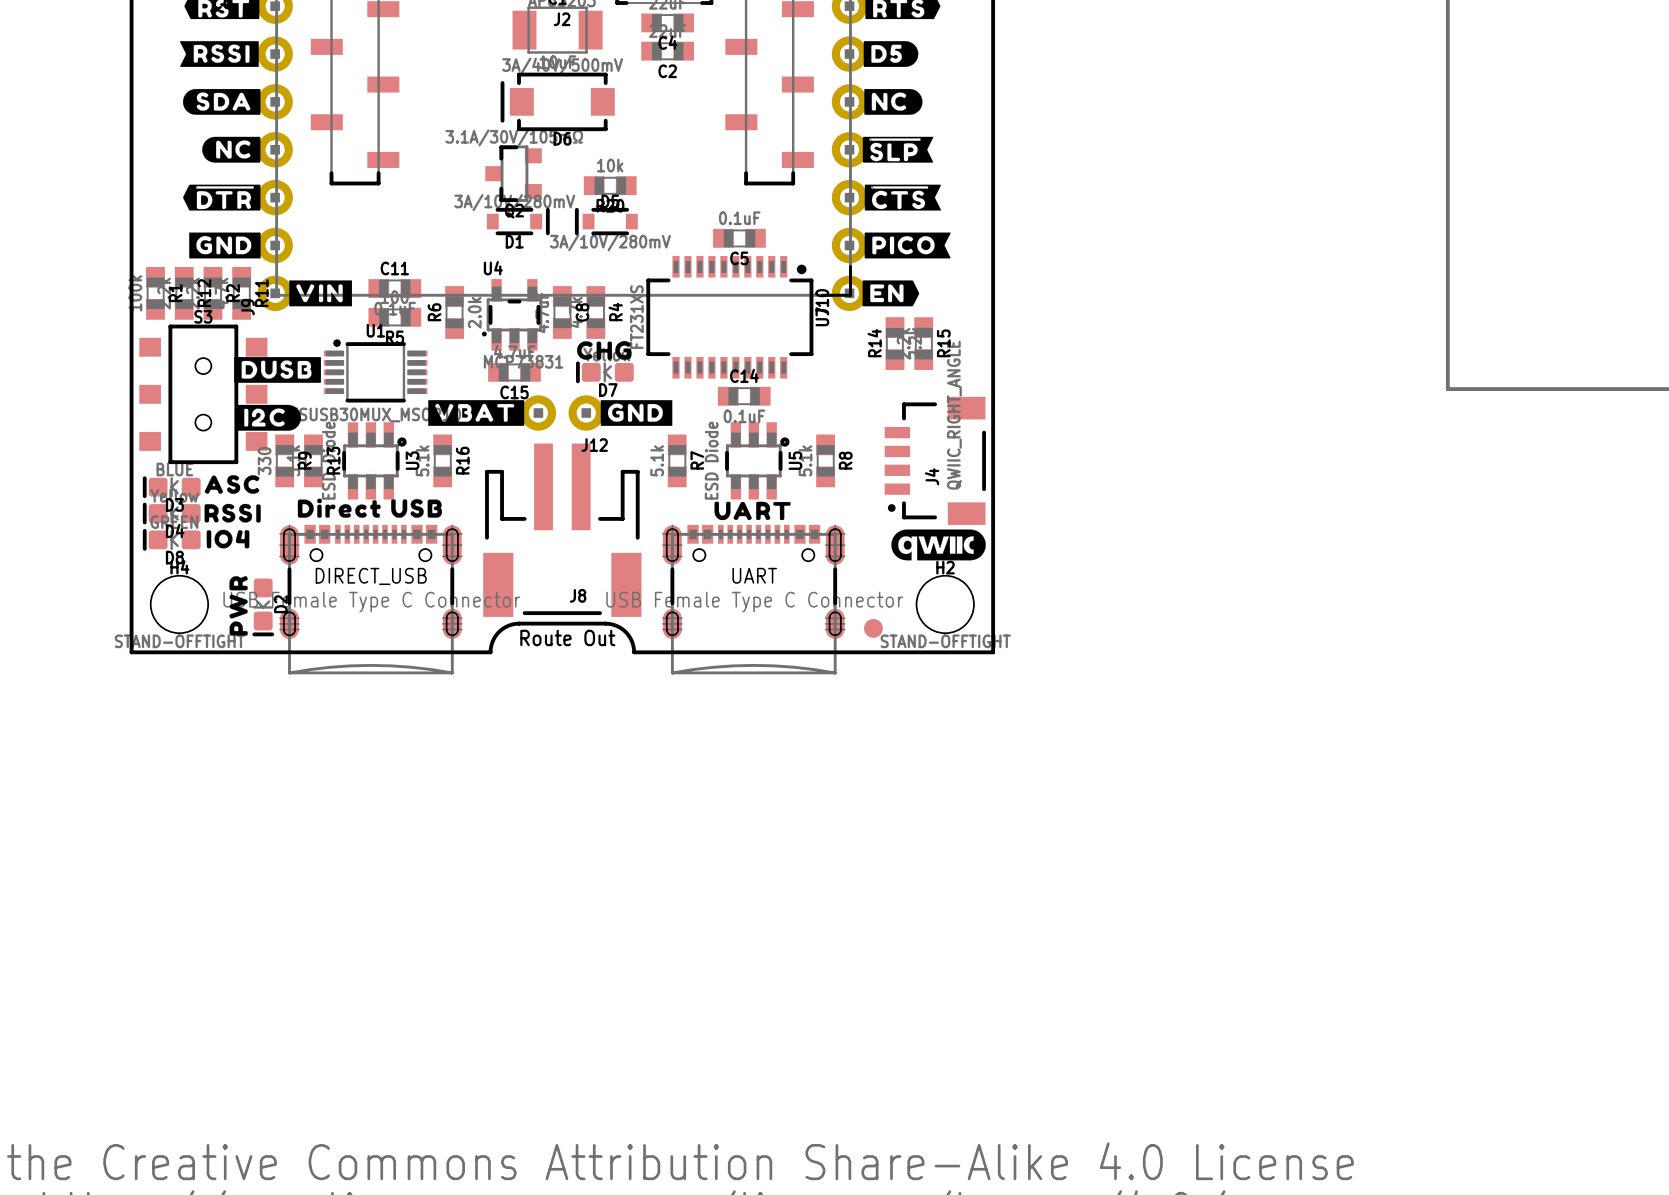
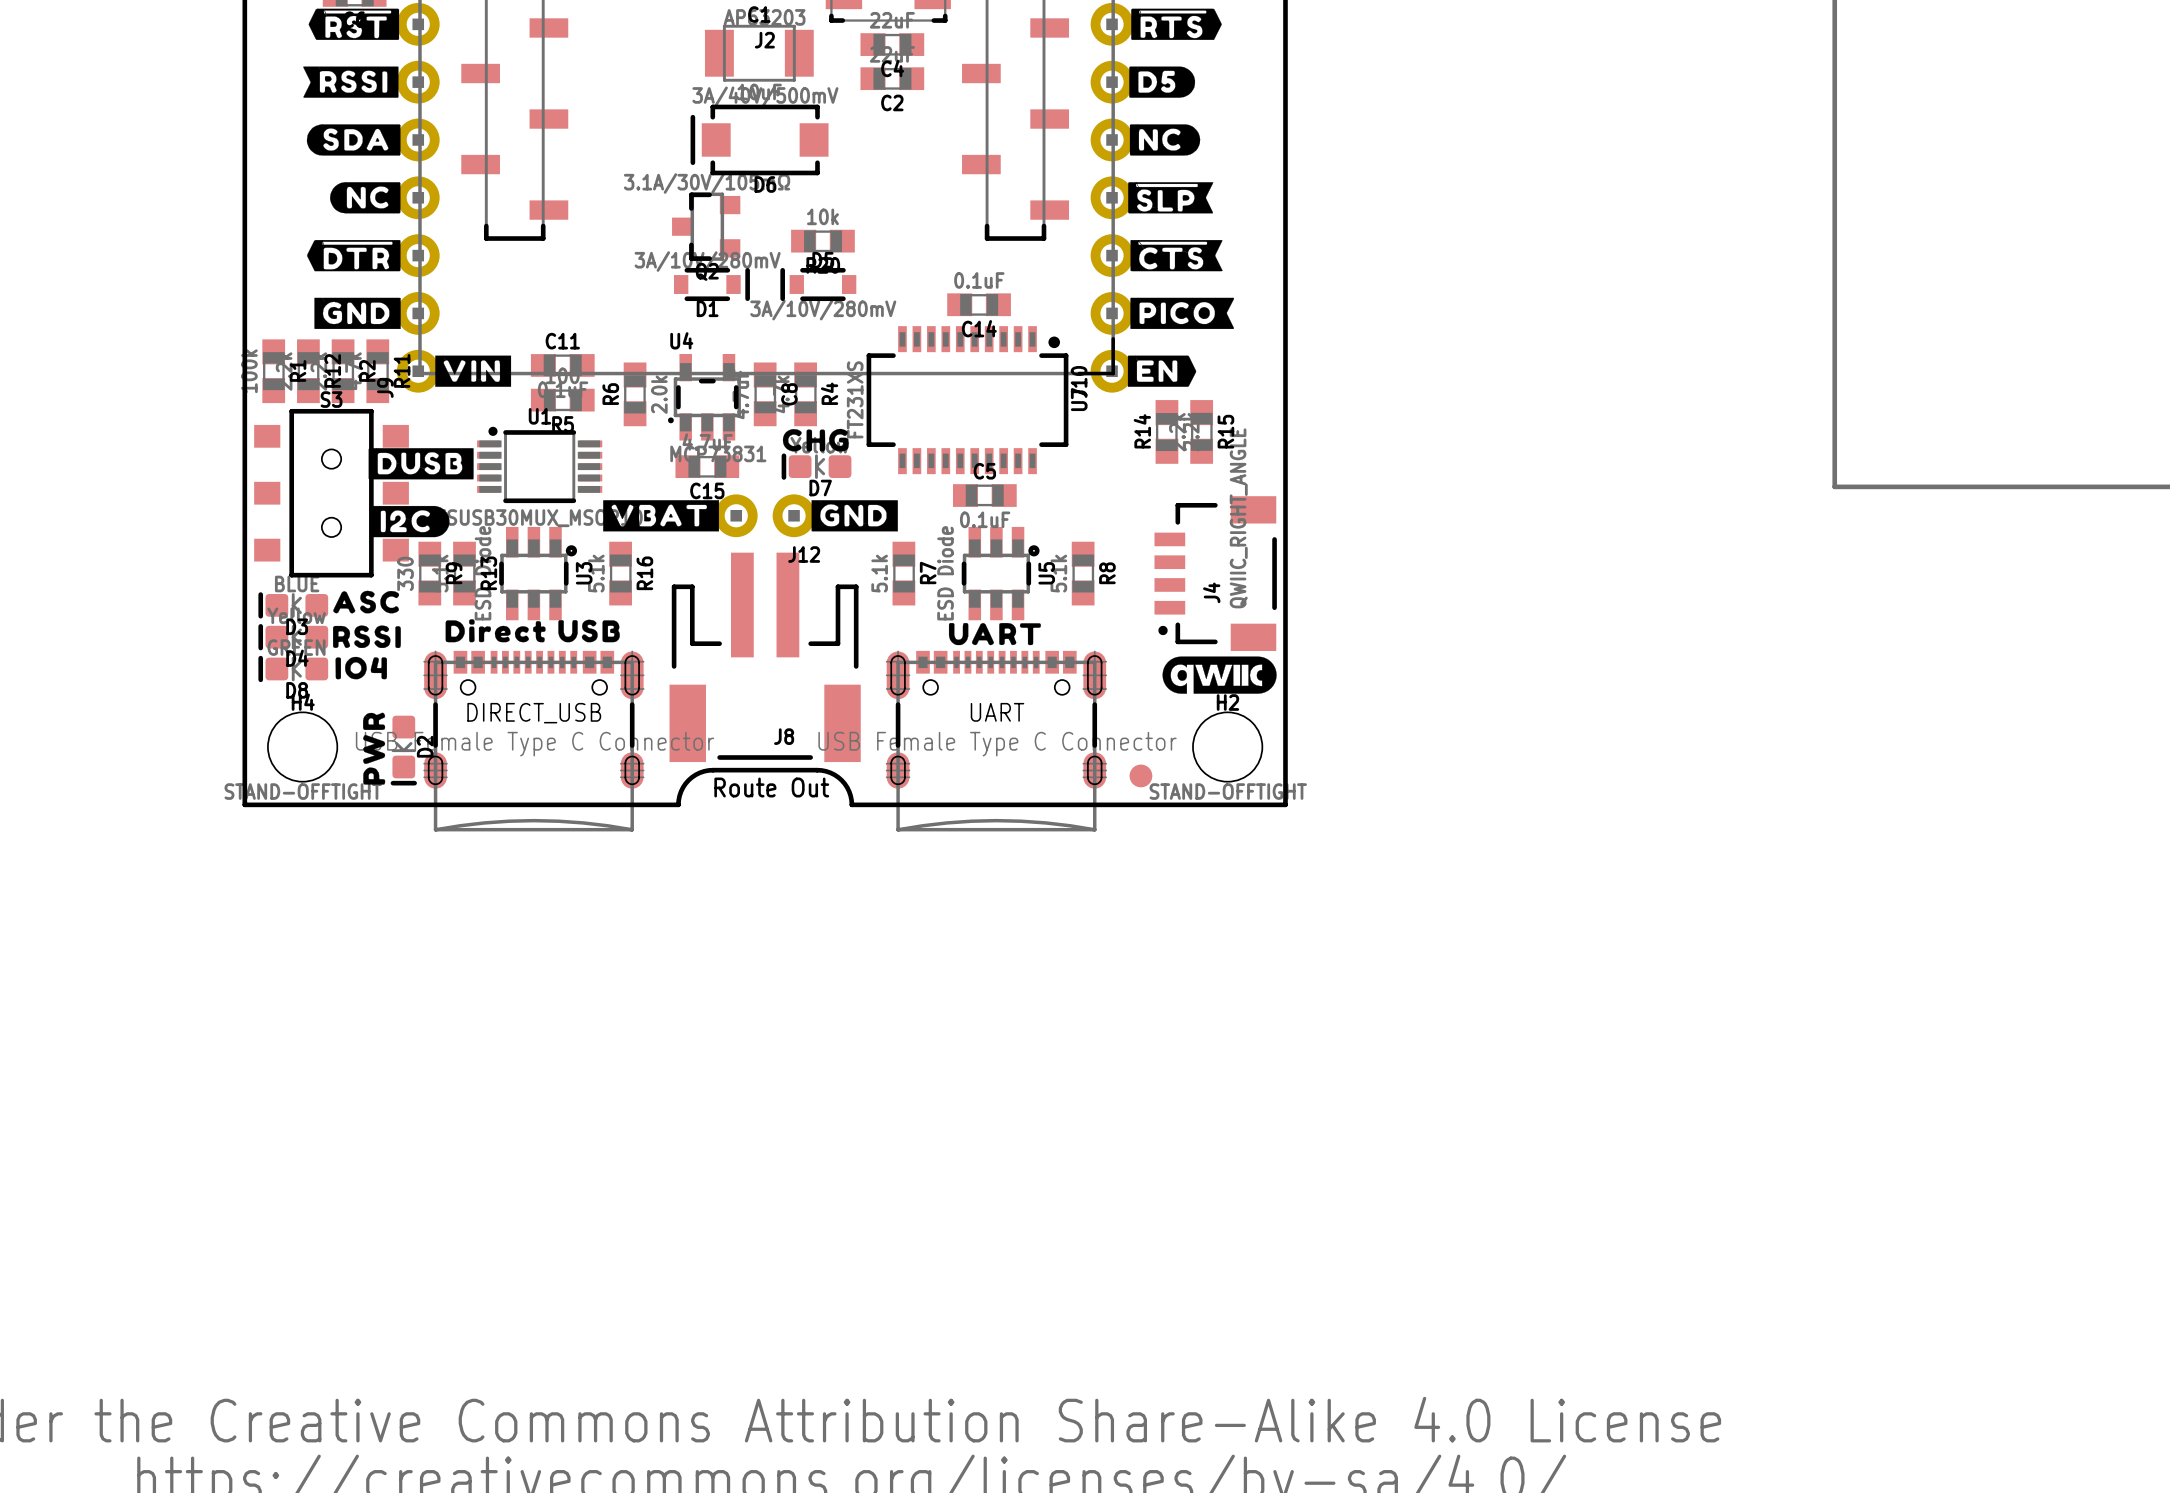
C5 name: C5 (739, 258) -> C14 (979, 328)
C14 name: C14 (744, 375) -> C5 (984, 471)

